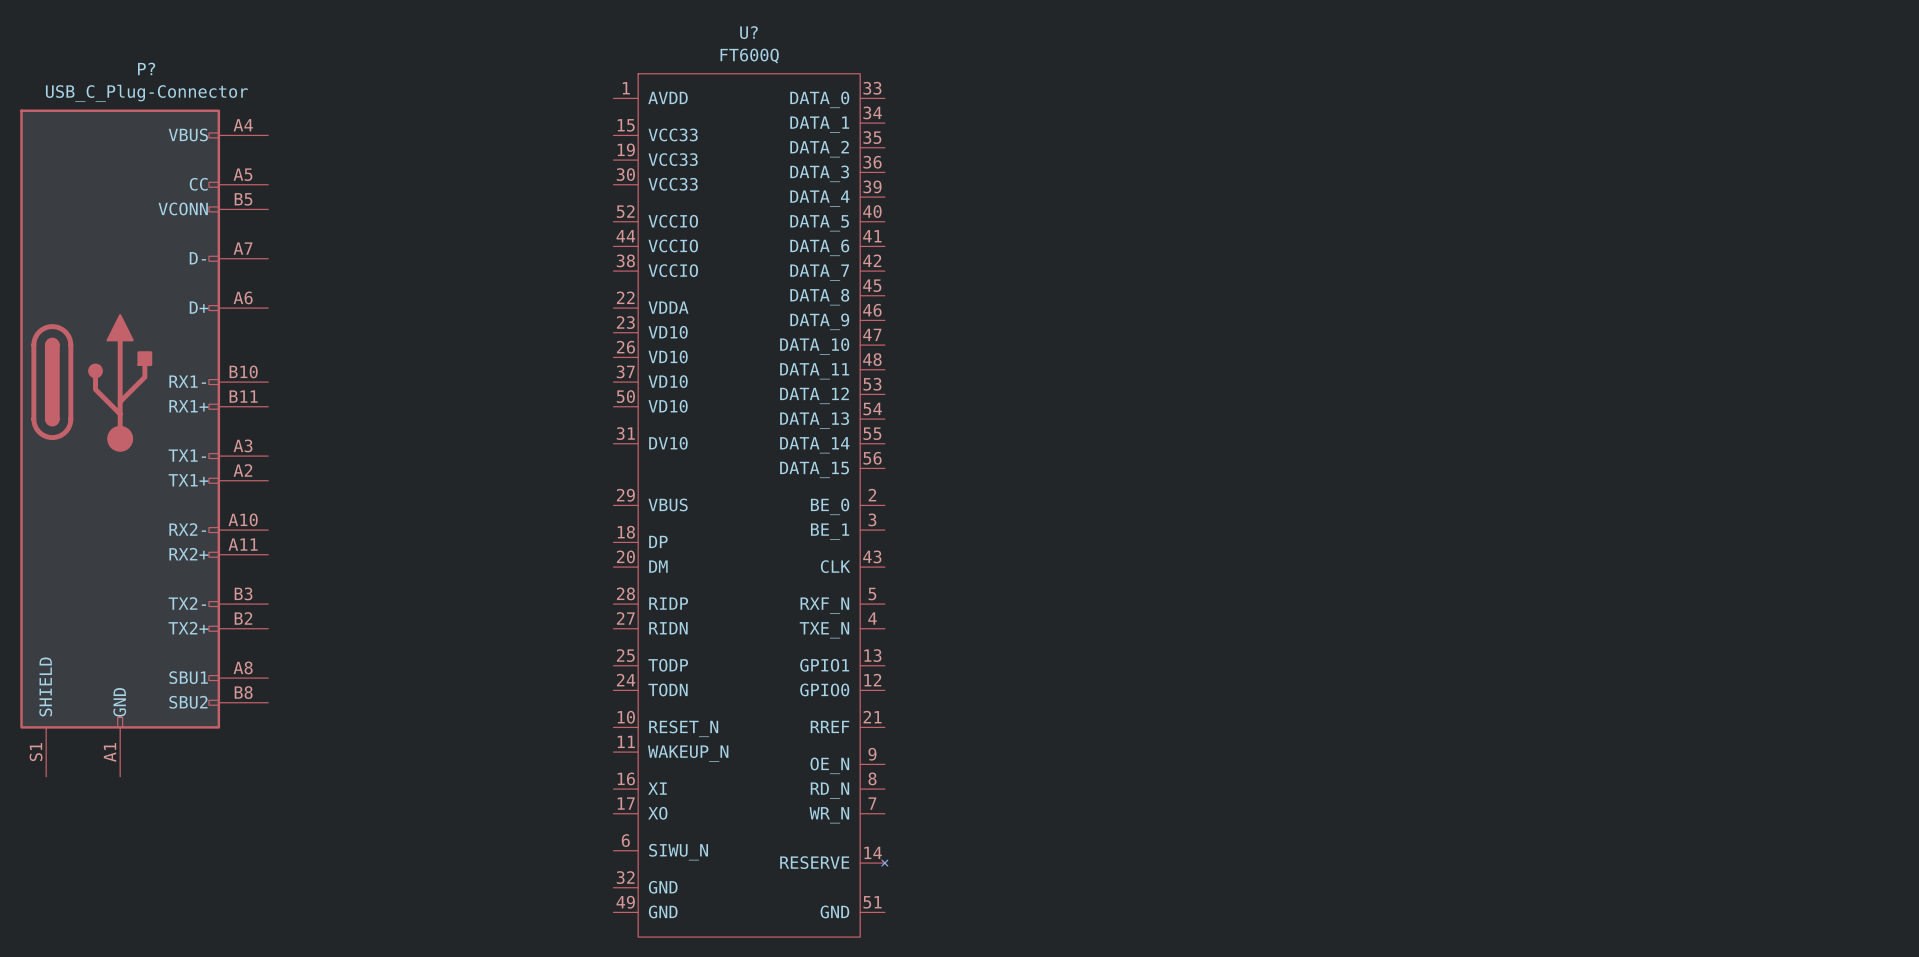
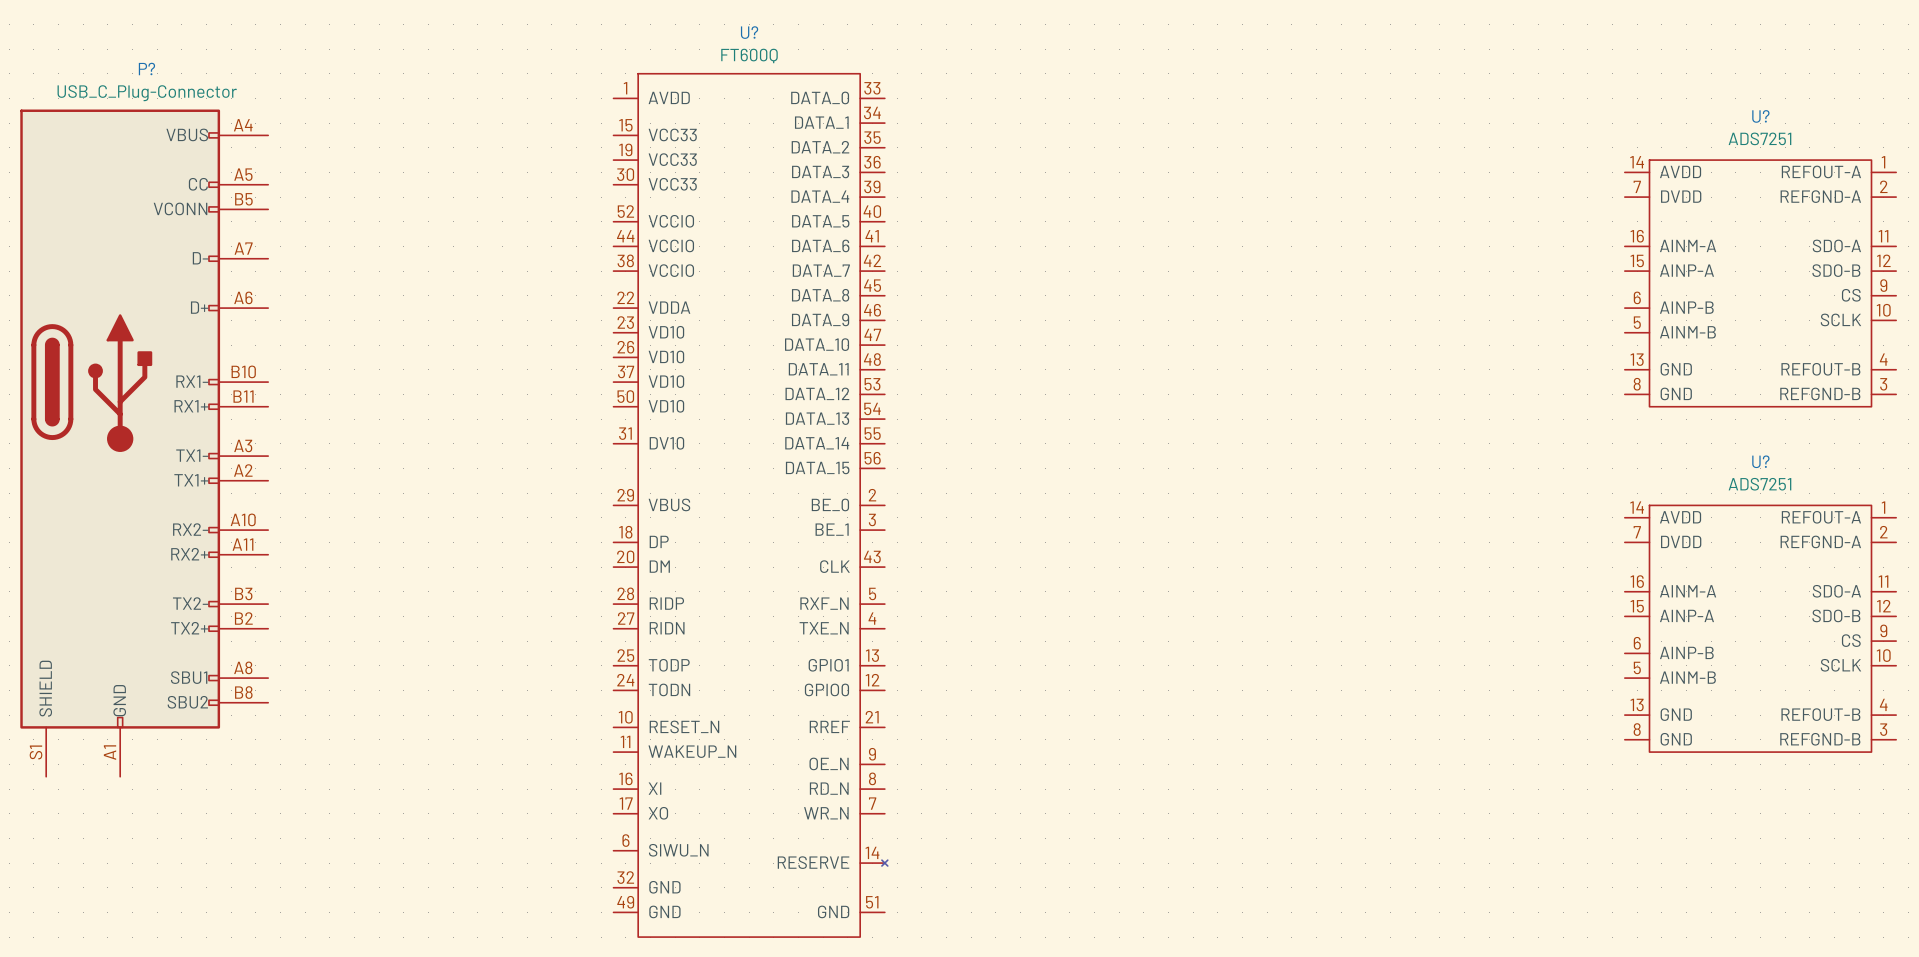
U?: none -> ADS7251 (1760, 283)
U?: none -> ADS7251 (1760, 628)

